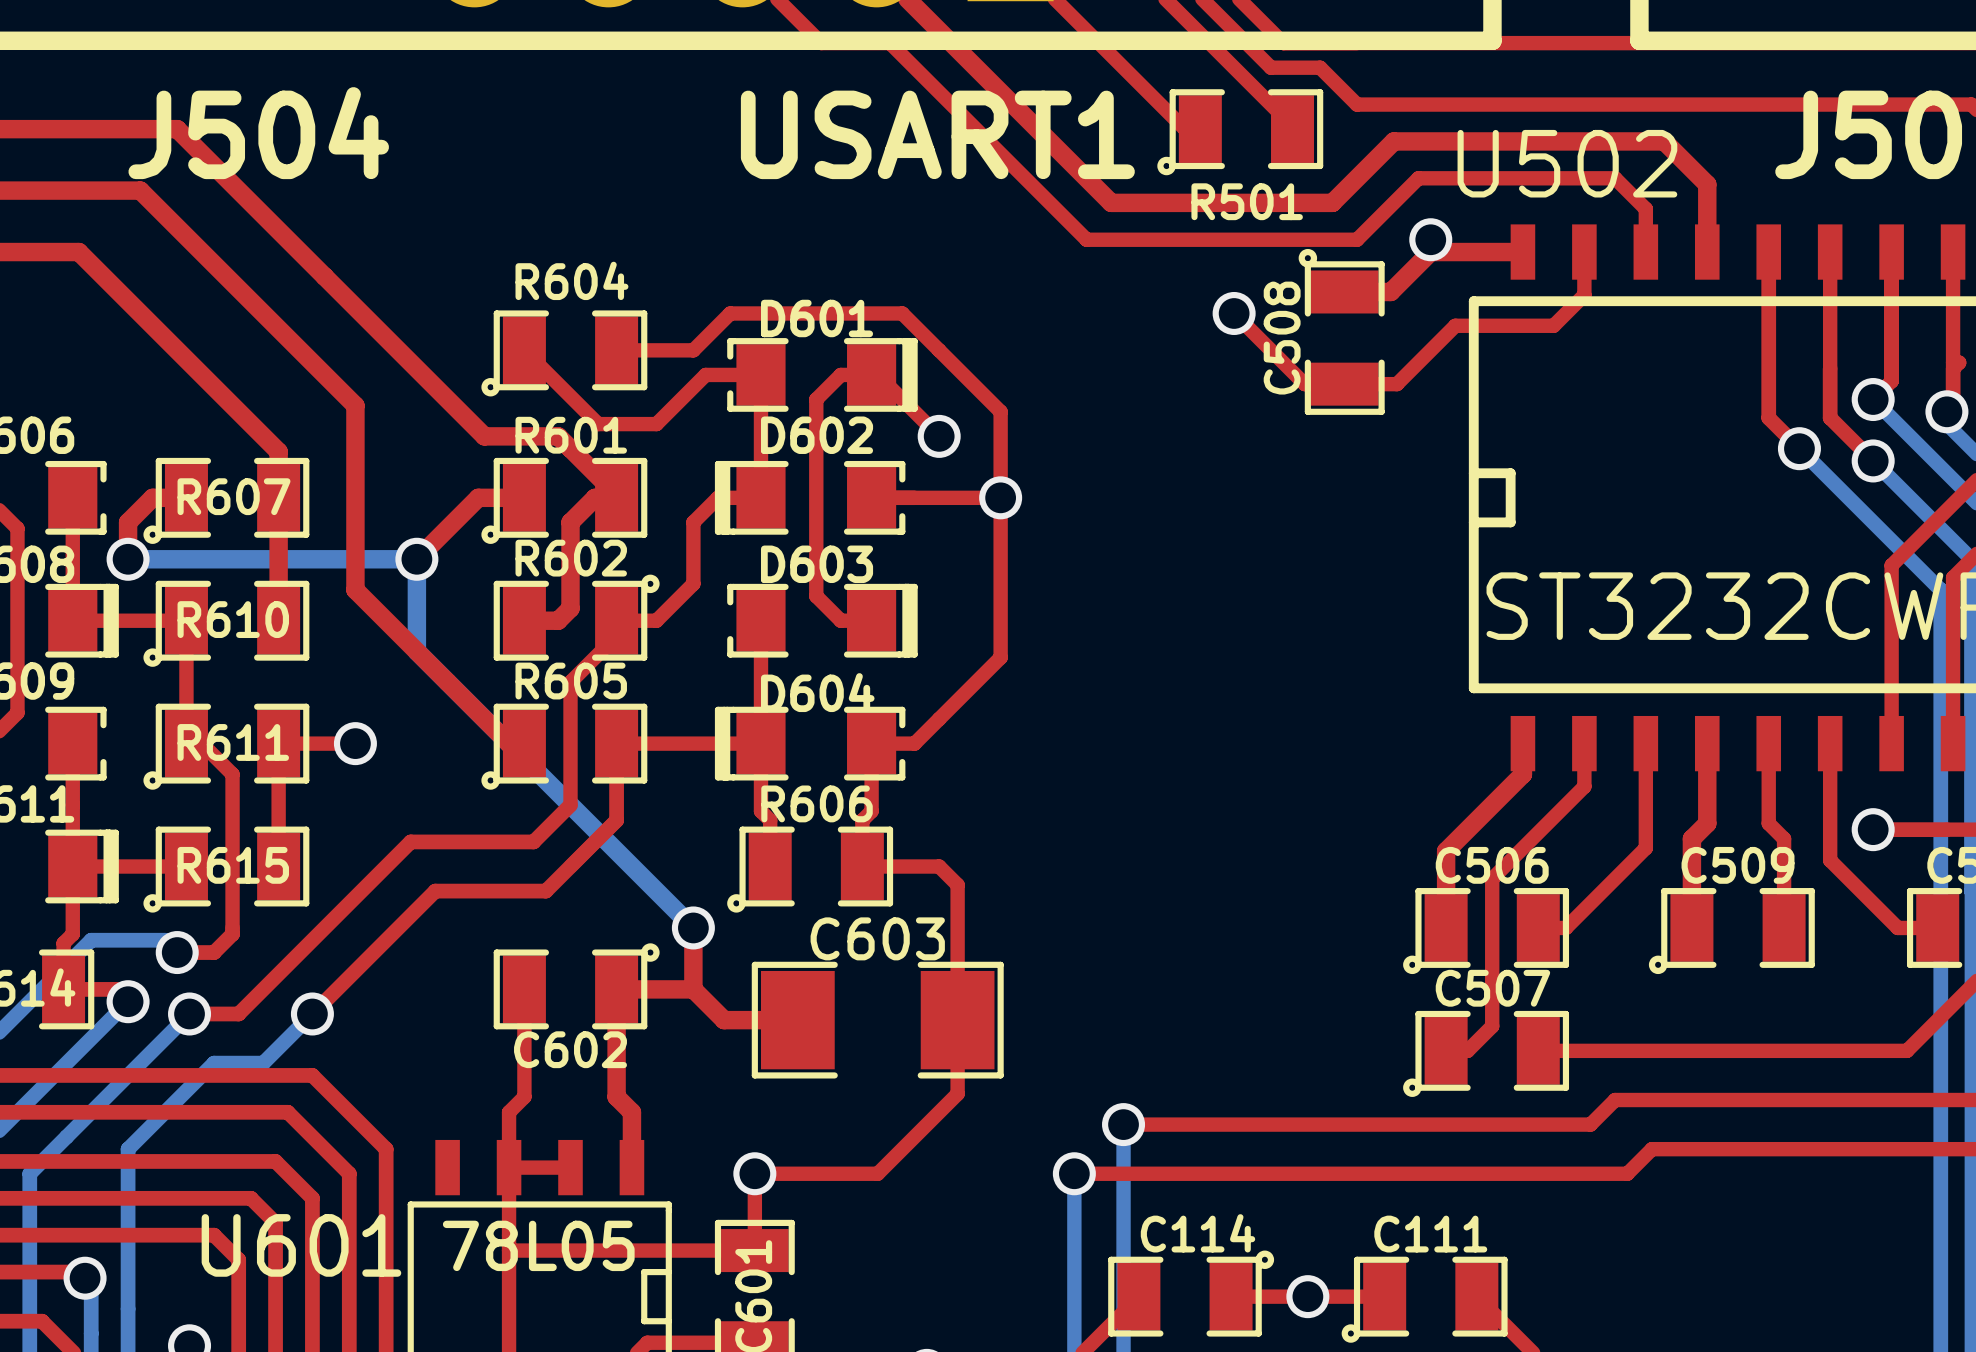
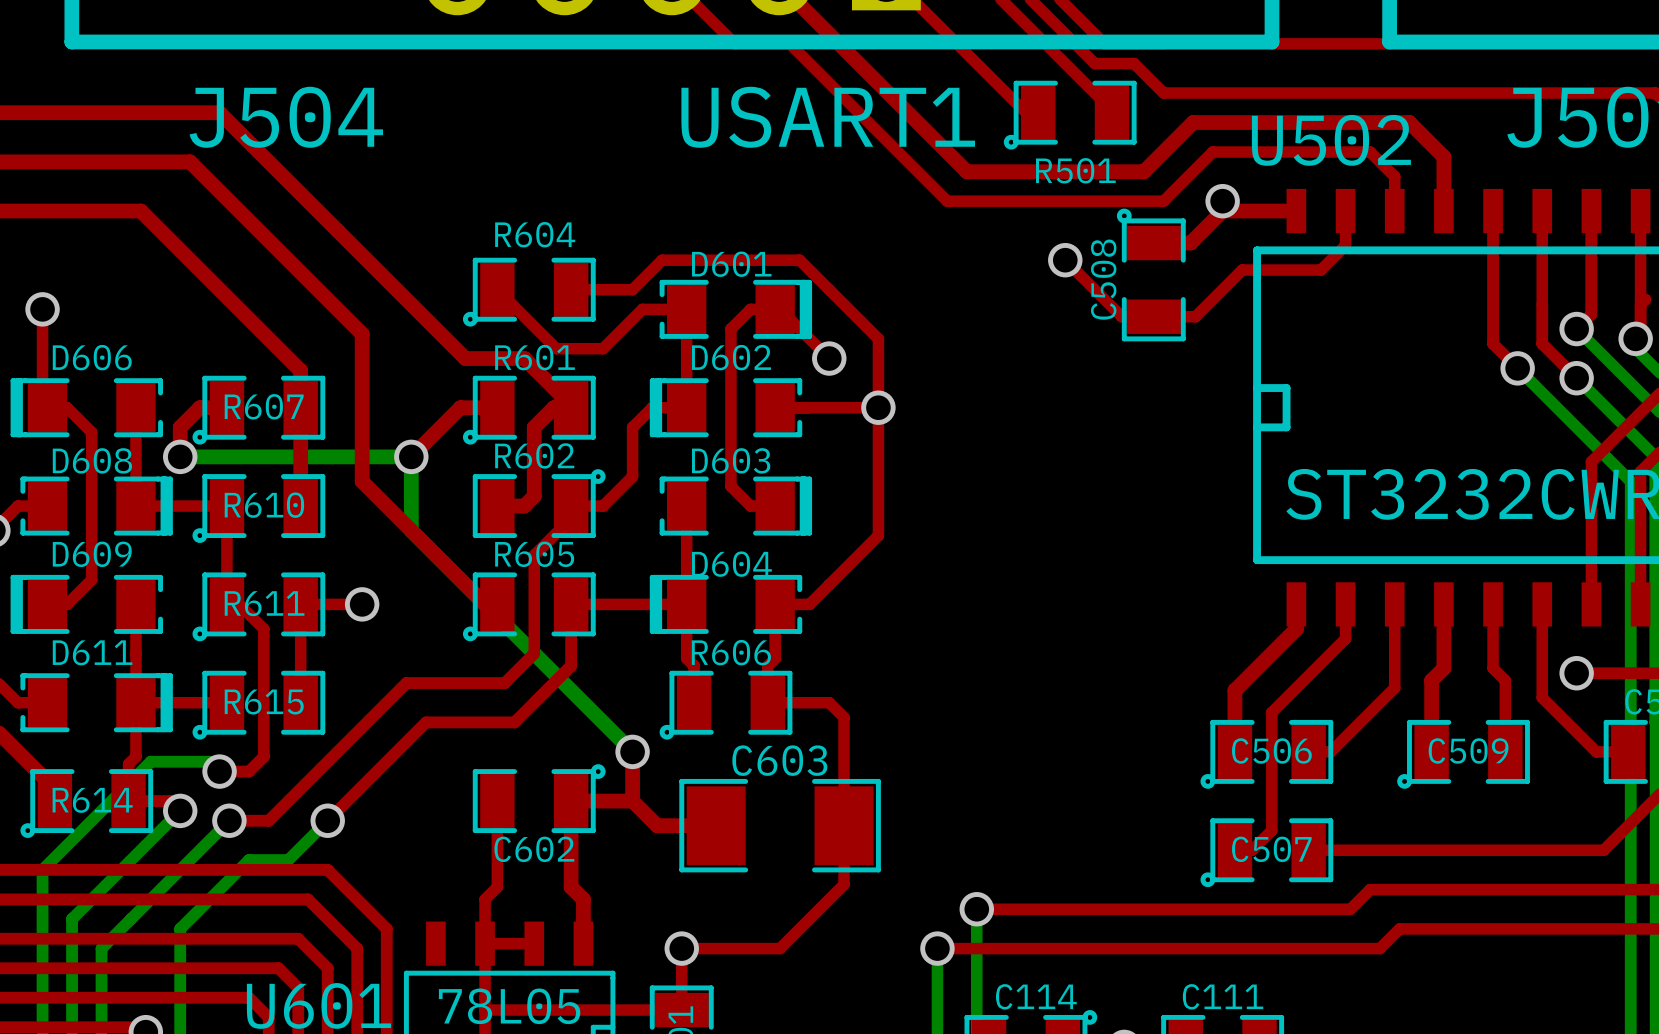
C506 name position: C506 (1492, 865) -> C506 (1271, 750)
C509 name position: C509 (1738, 865) -> C509 (1468, 750)
C507 name position: C507 (1492, 988) -> C507 (1271, 849)

